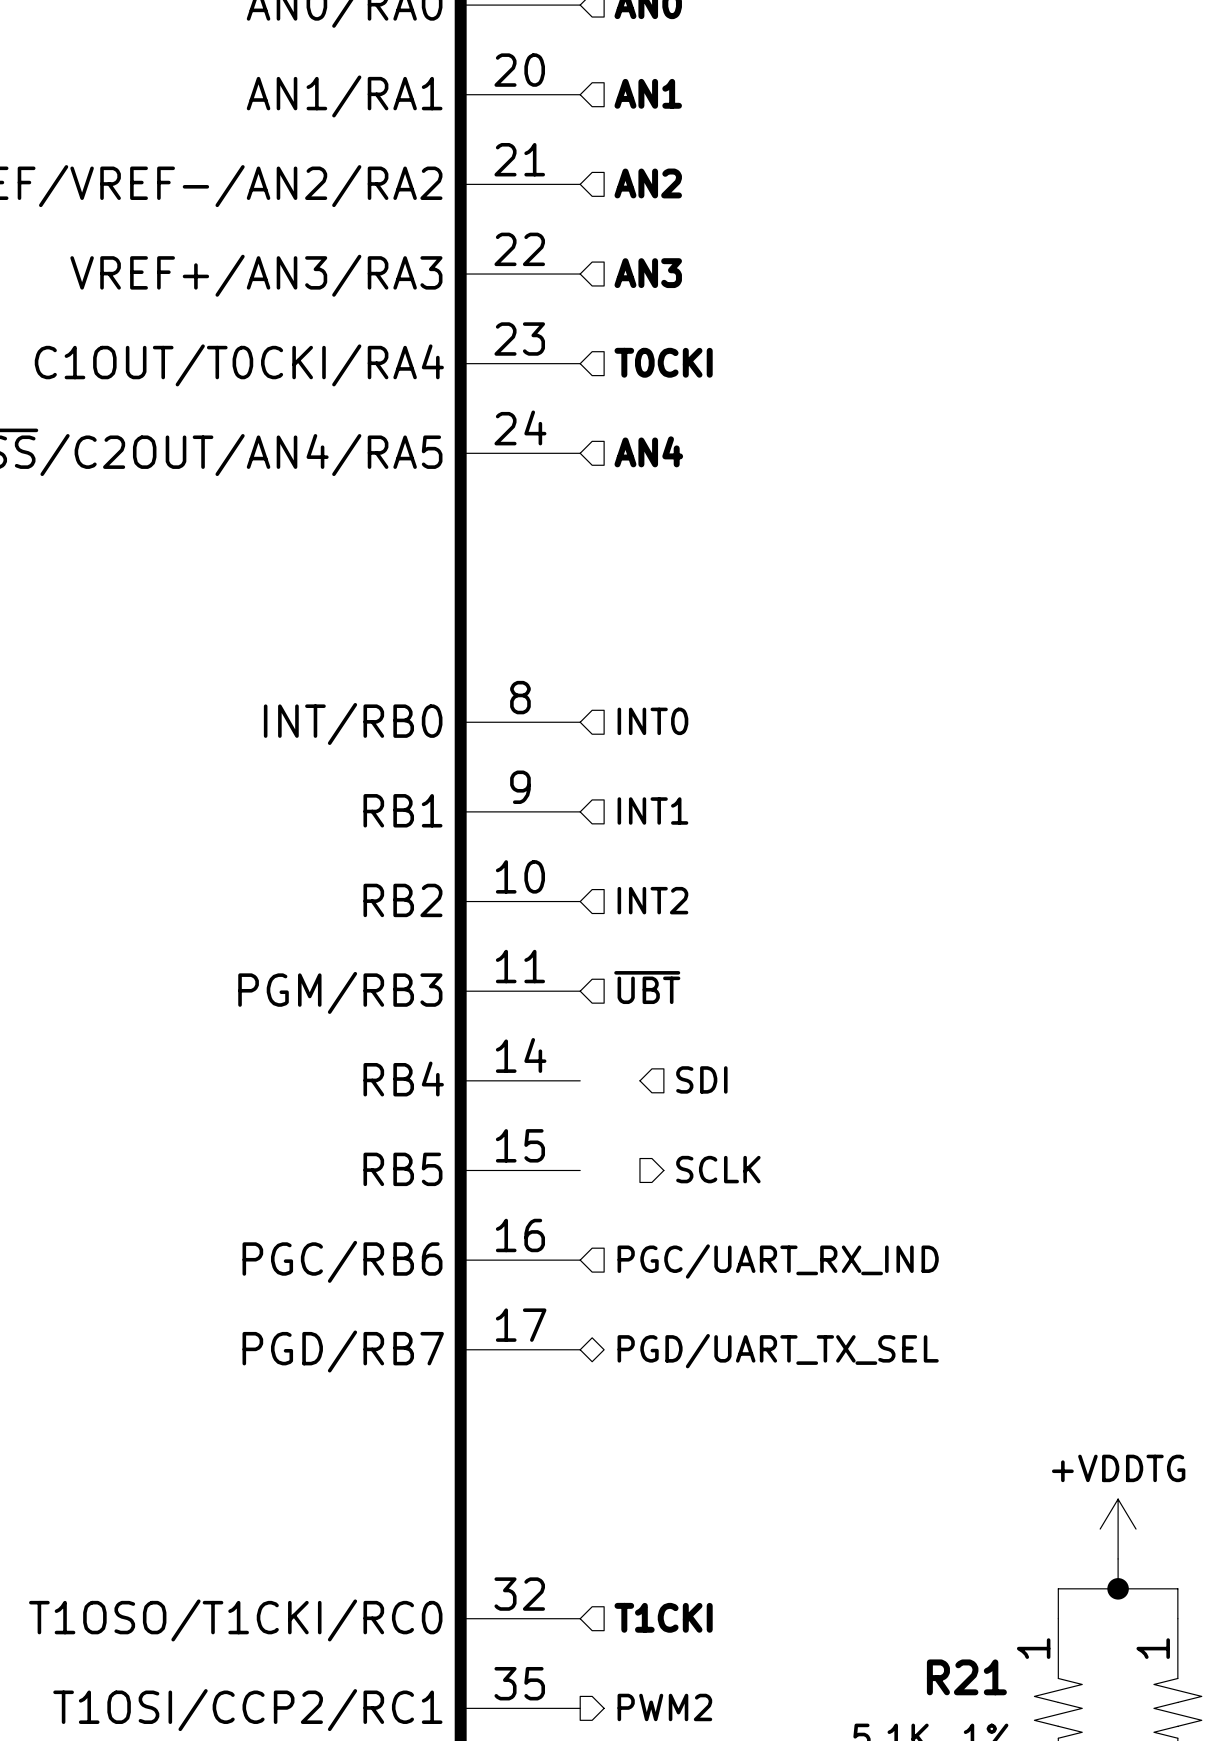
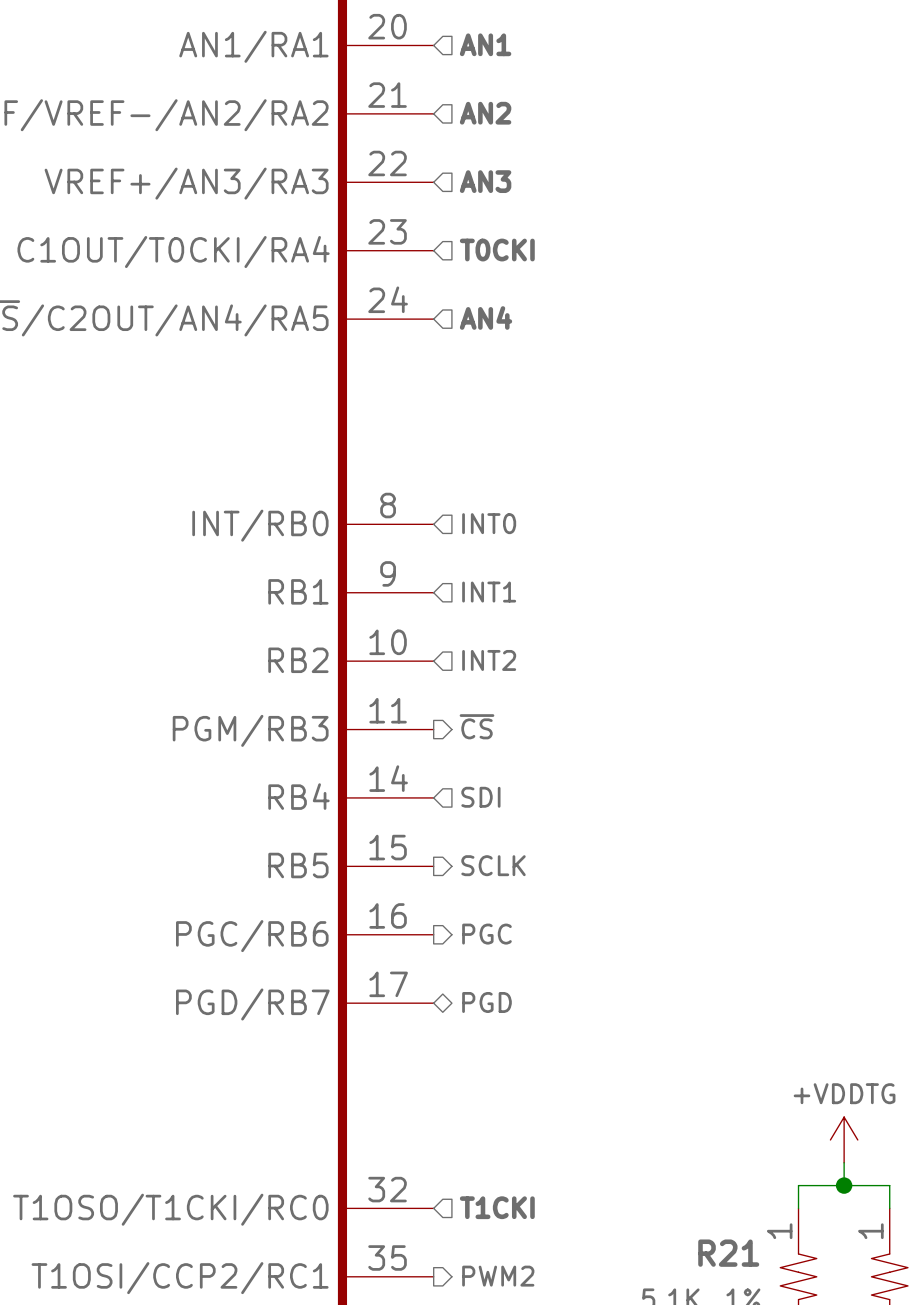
hierarchical label shape: input (647, 987) -> output (477, 726)
hierarchical label: ~{UBT} (647, 987) -> ~{CS} (477, 726)
hierarchical label position: SDI (701, 1079) -> SDI (480, 797)
hierarchical label position: SCLK (718, 1169) -> SCLK (493, 865)
hierarchical label shape: input (778, 1261) -> output (486, 934)
hierarchical label: PGC/UART_RX_IND (778, 1261) -> PGC (486, 934)
hierarchical label: PGD/UART_TX_SEL (778, 1351) -> PGD (486, 1002)

